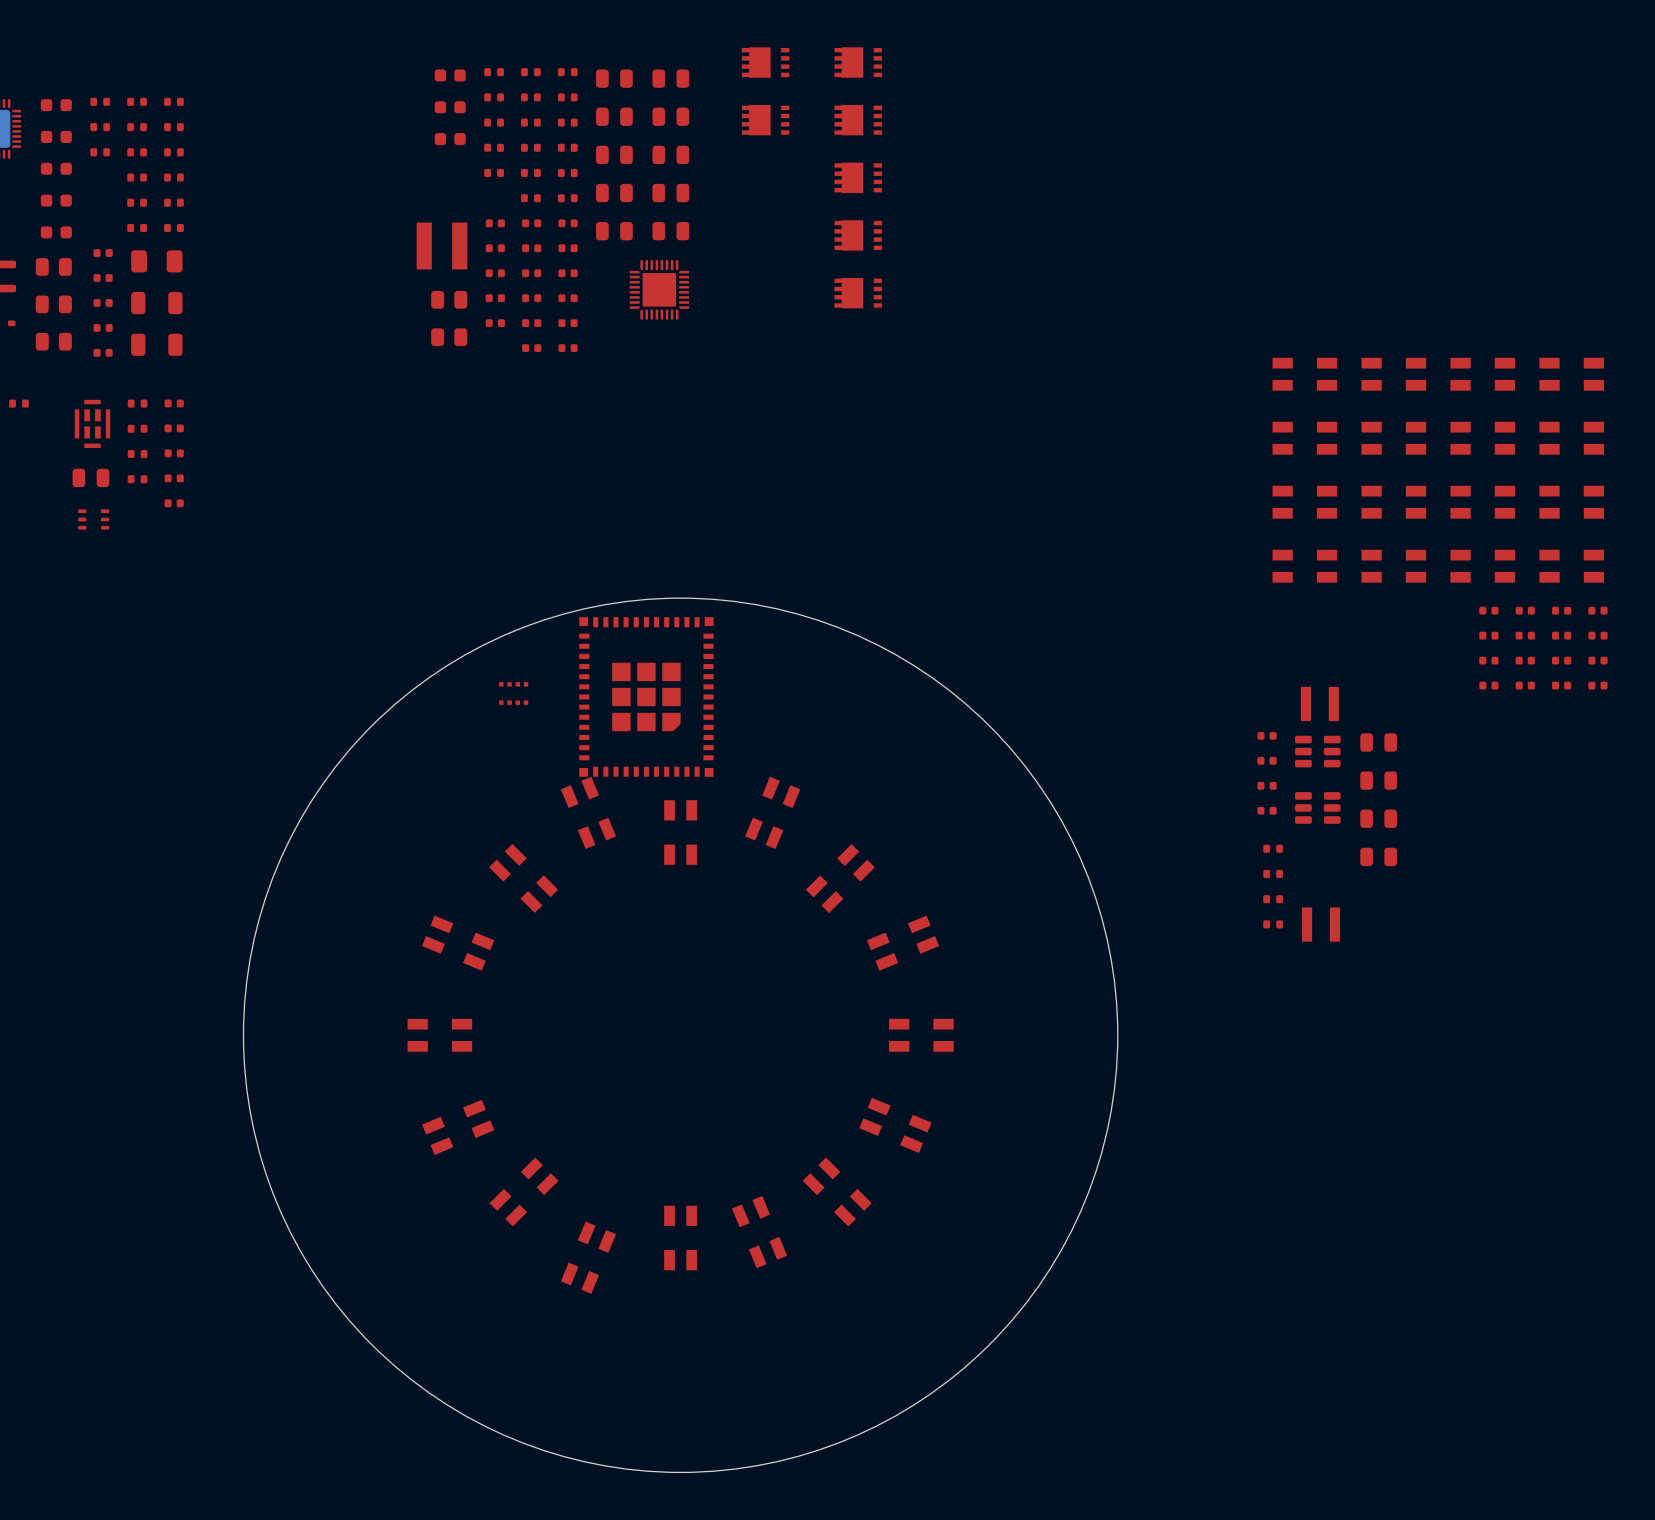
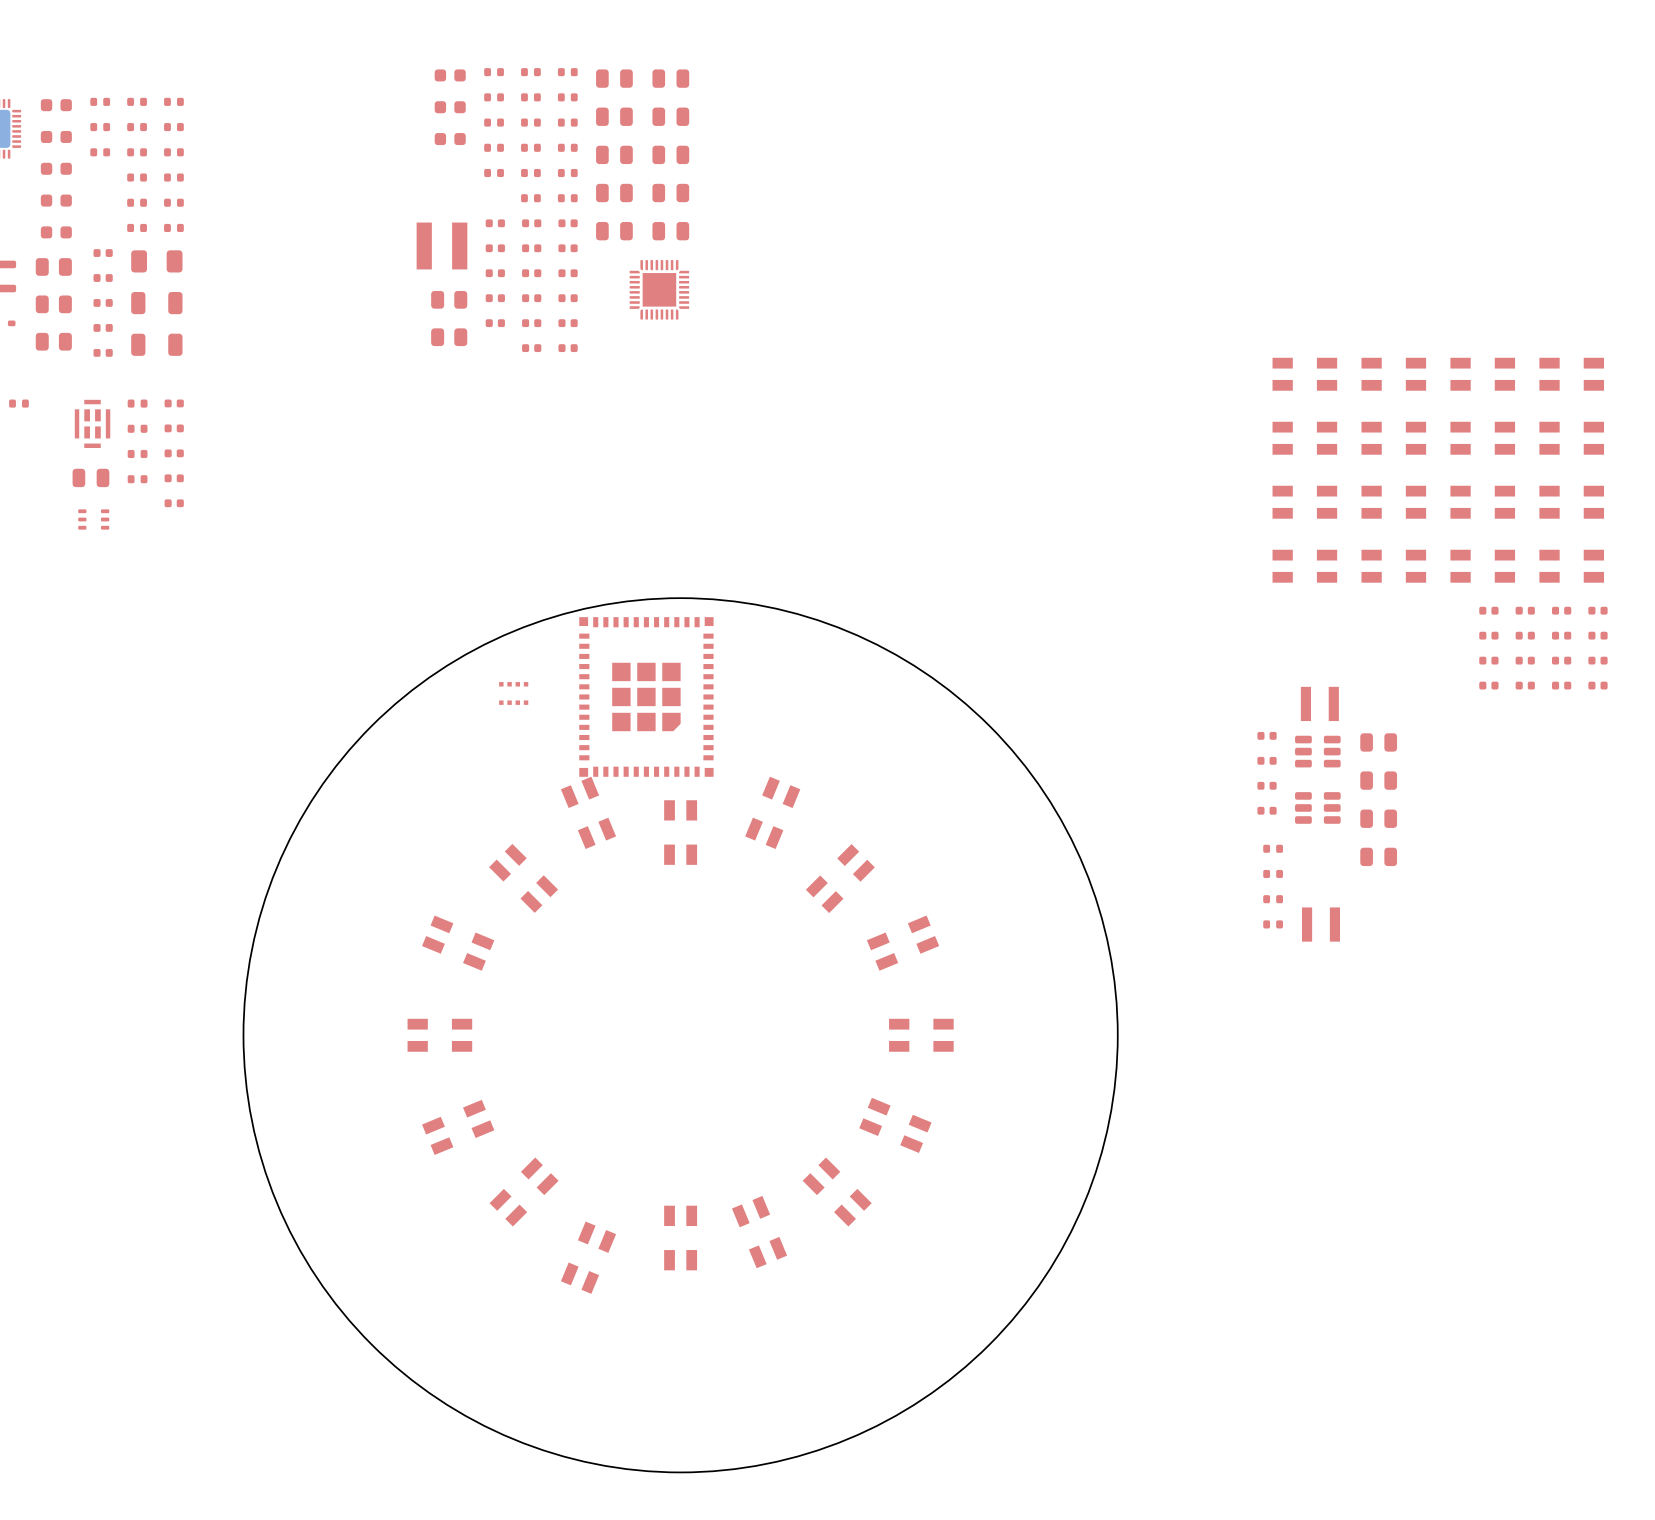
part: (765, 62) -> none
part: (858, 62) -> none
part: (765, 120) -> none
part: (858, 120) -> none
part: (858, 177) -> none
part: (858, 235) -> none
part: (858, 293) -> none

